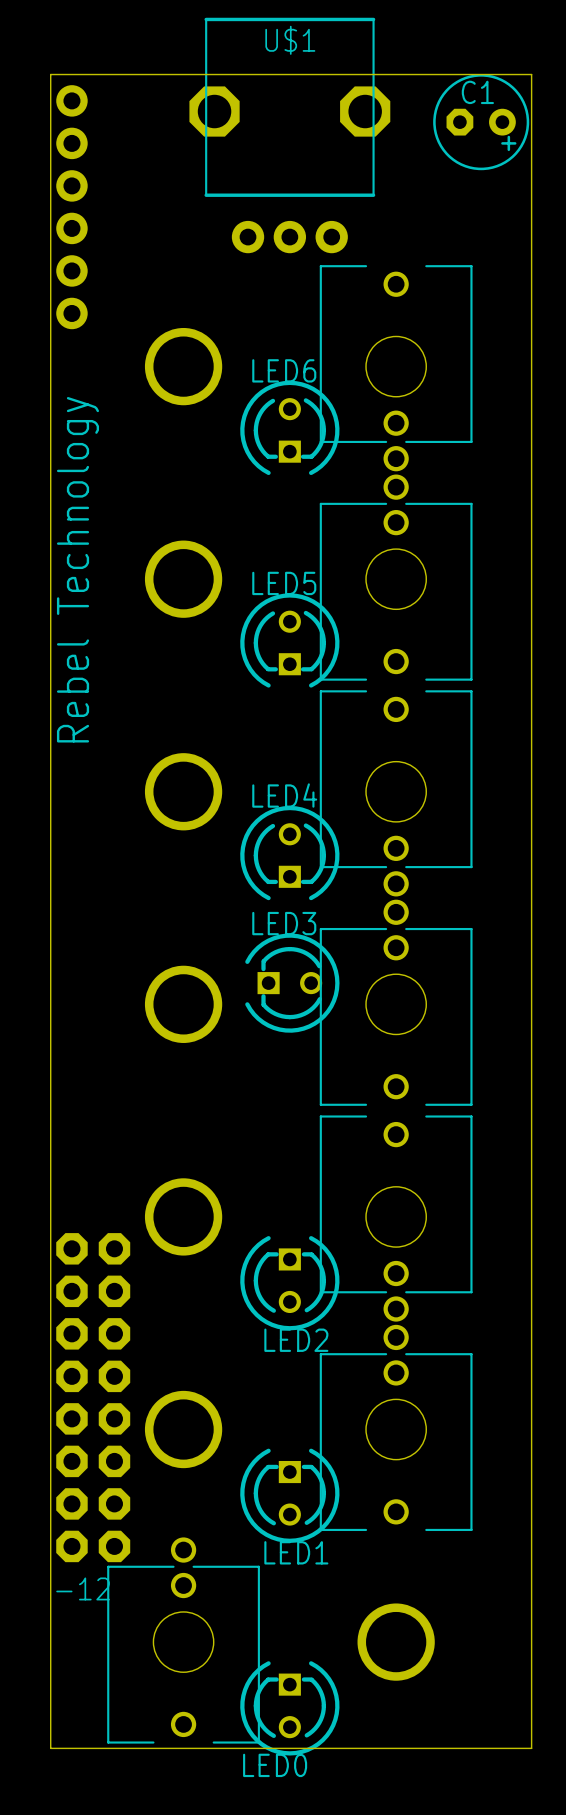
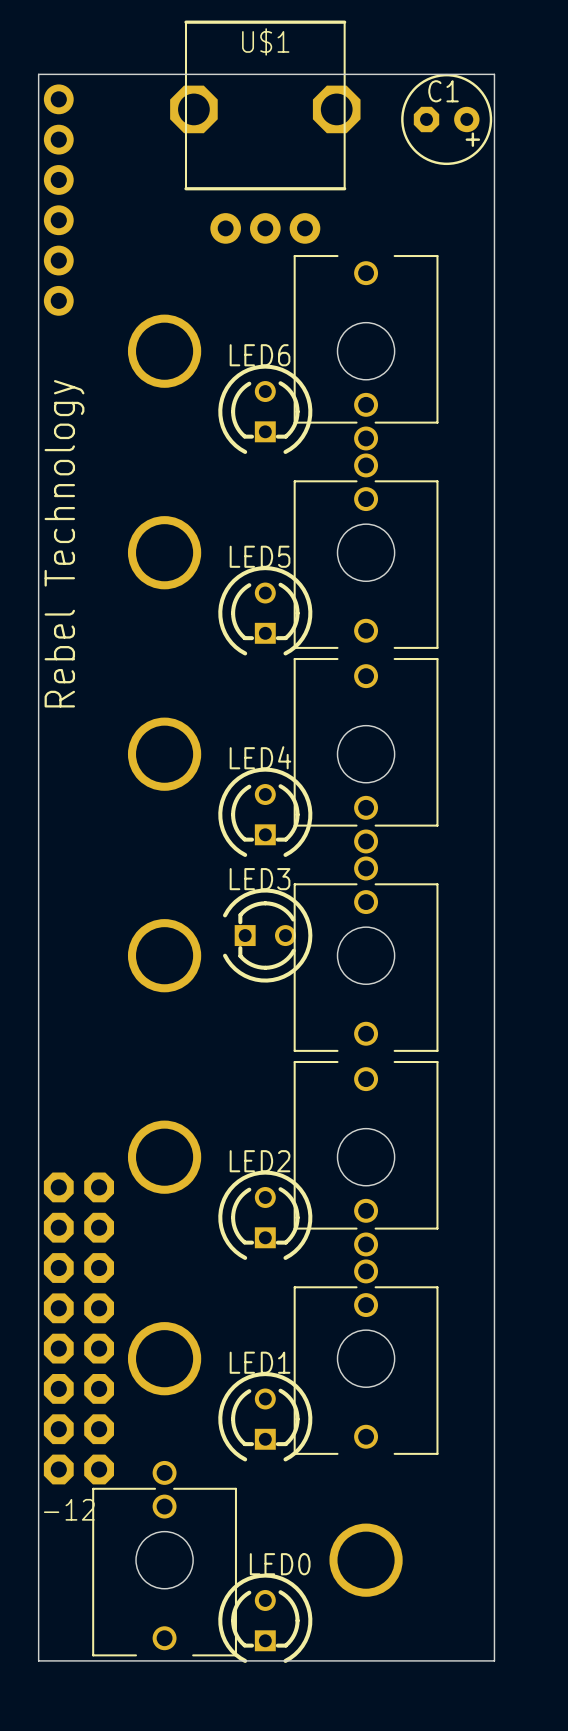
LED2 rotation: 0° (289, 1283) -> 180° (265, 1215)
LED1 rotation: 0° (289, 1495) -> 180° (265, 1416)
LED0 rotation: 0° (289, 1708) -> 180° (265, 1618)

